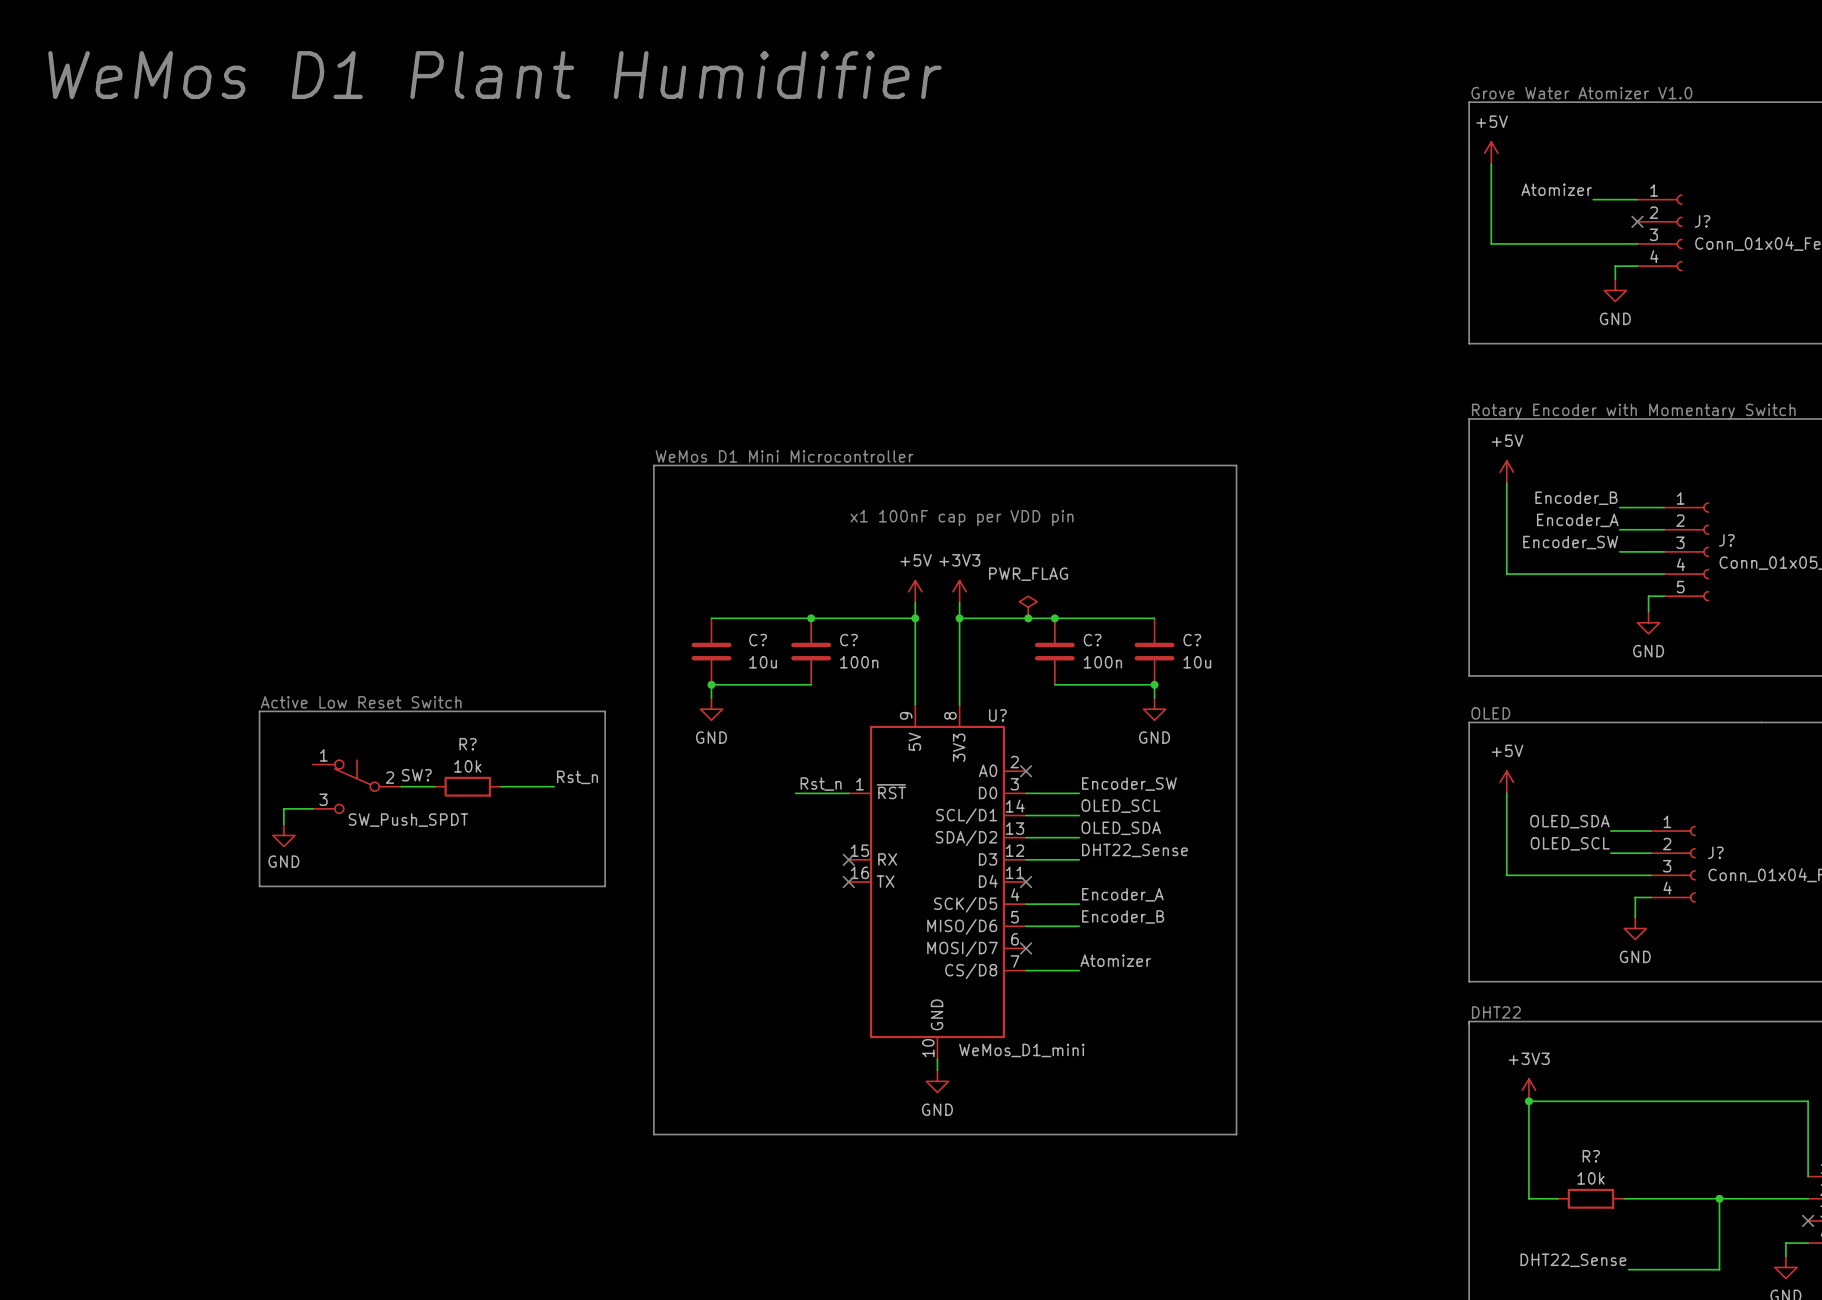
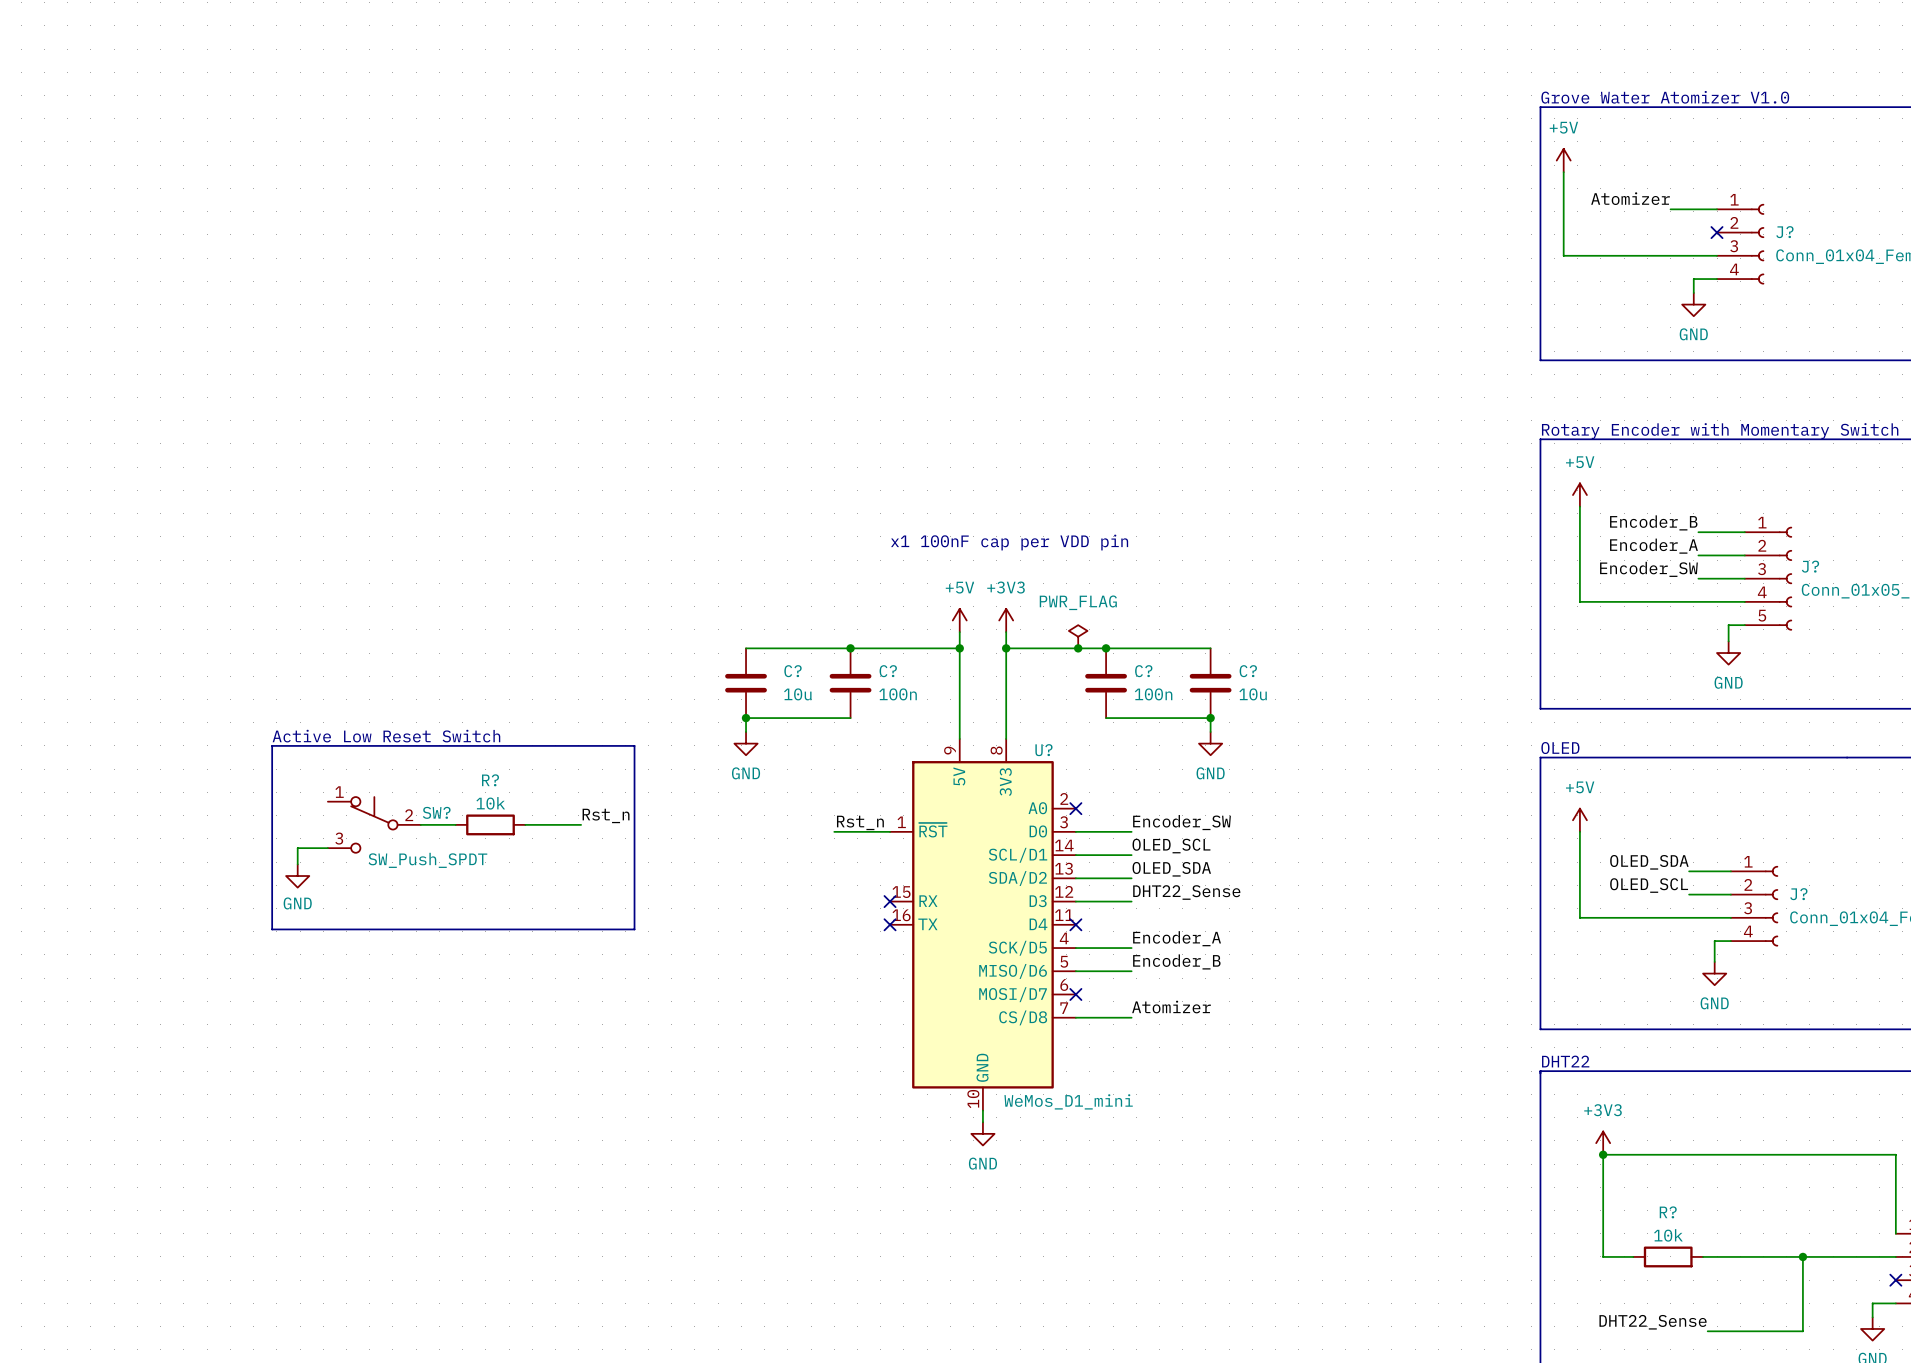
text: WeMos D1 Plant Humidifier (494, 75) -> none
text: WeMos D1 Mini Microcontroller (784, 456) -> none
line: (653, 465) (653, 1134) (1236, 1134) (1236, 465) (653, 465) -> none

